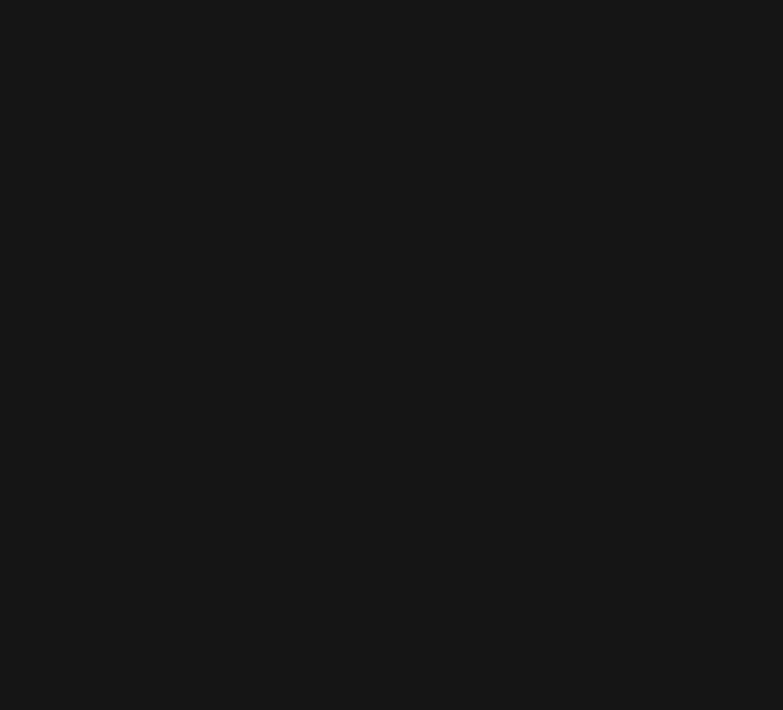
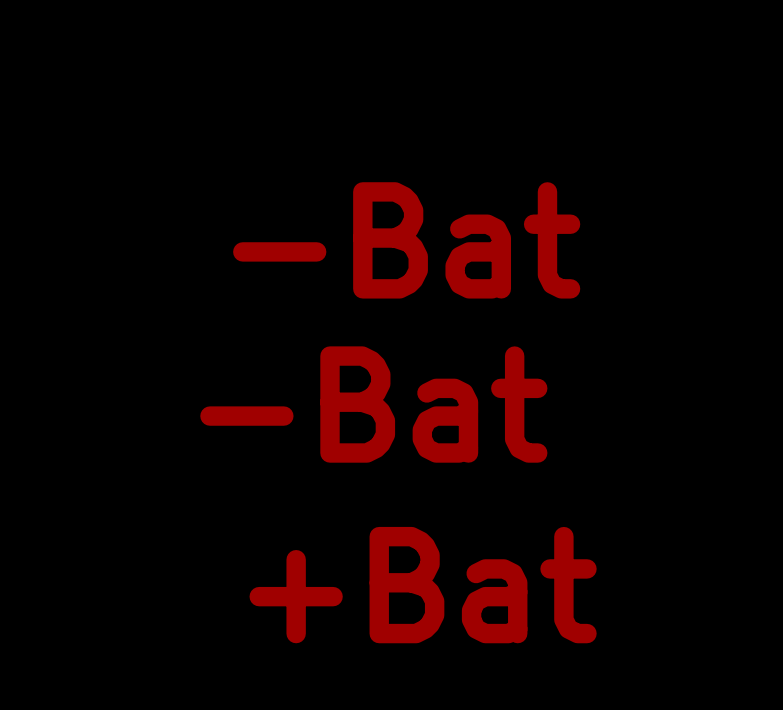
text: none -> -Bat (406, 240)
text: none -> -Bat (373, 404)
text: none -> +Bat (423, 585)

